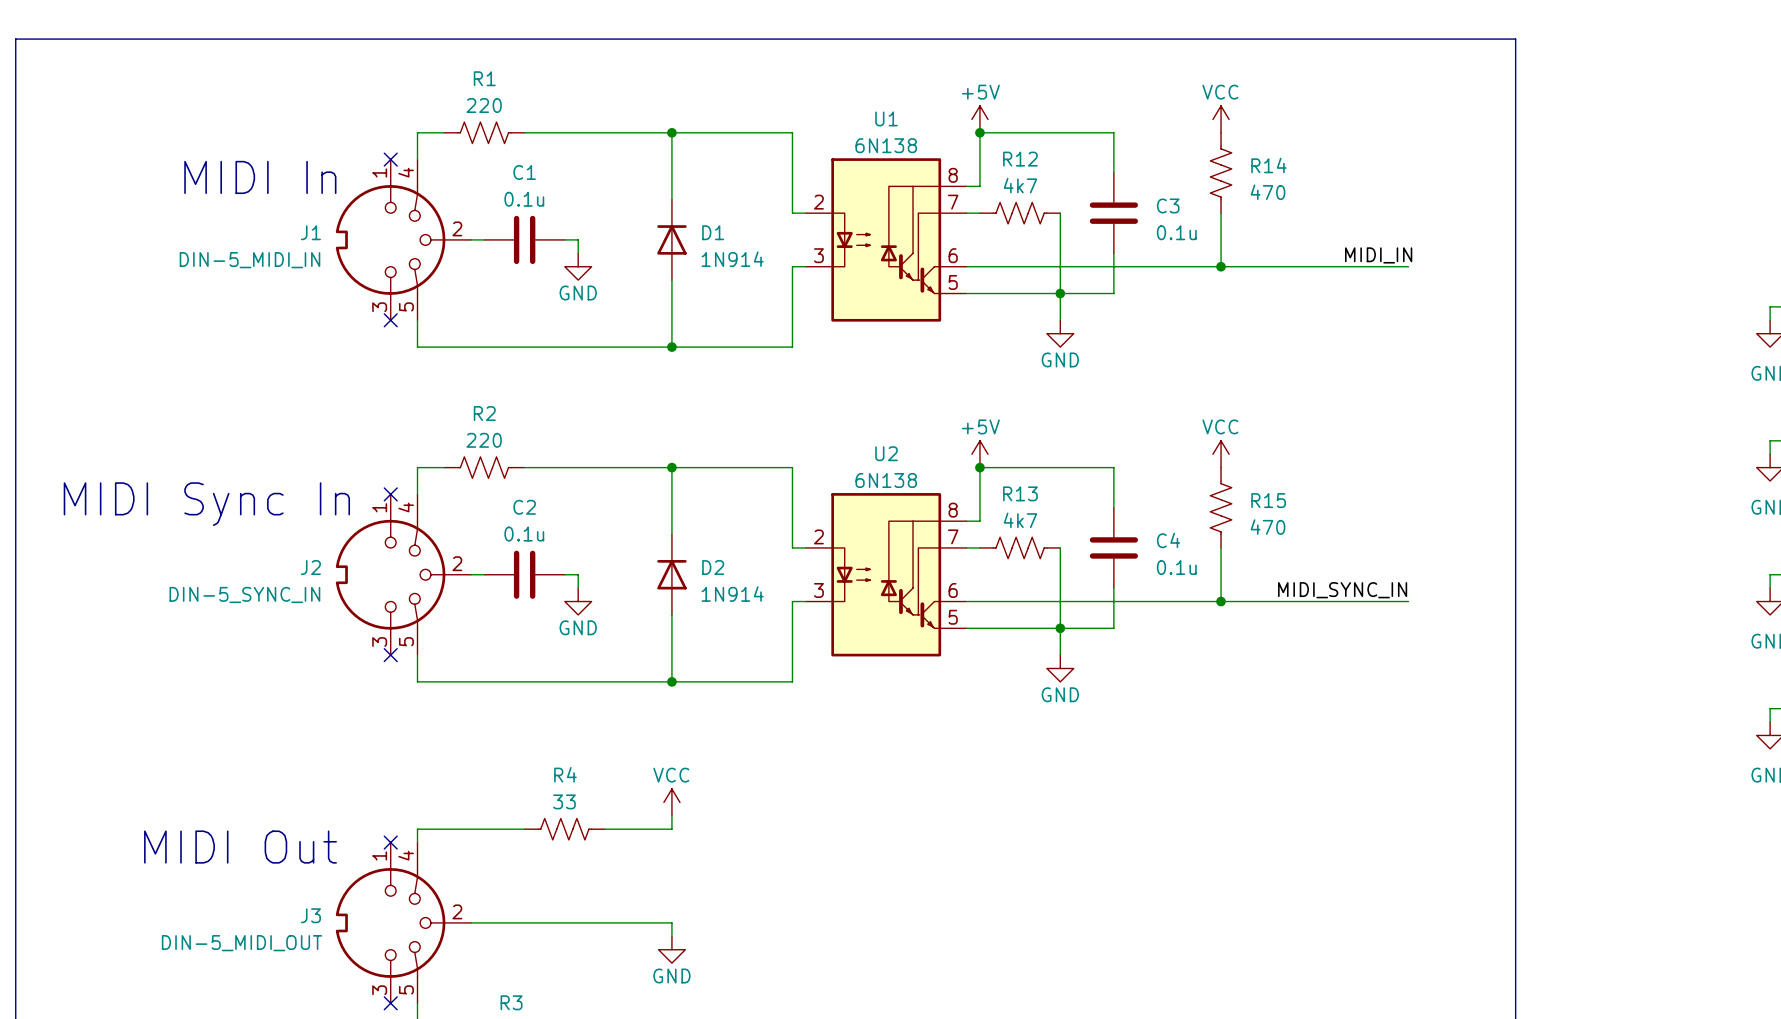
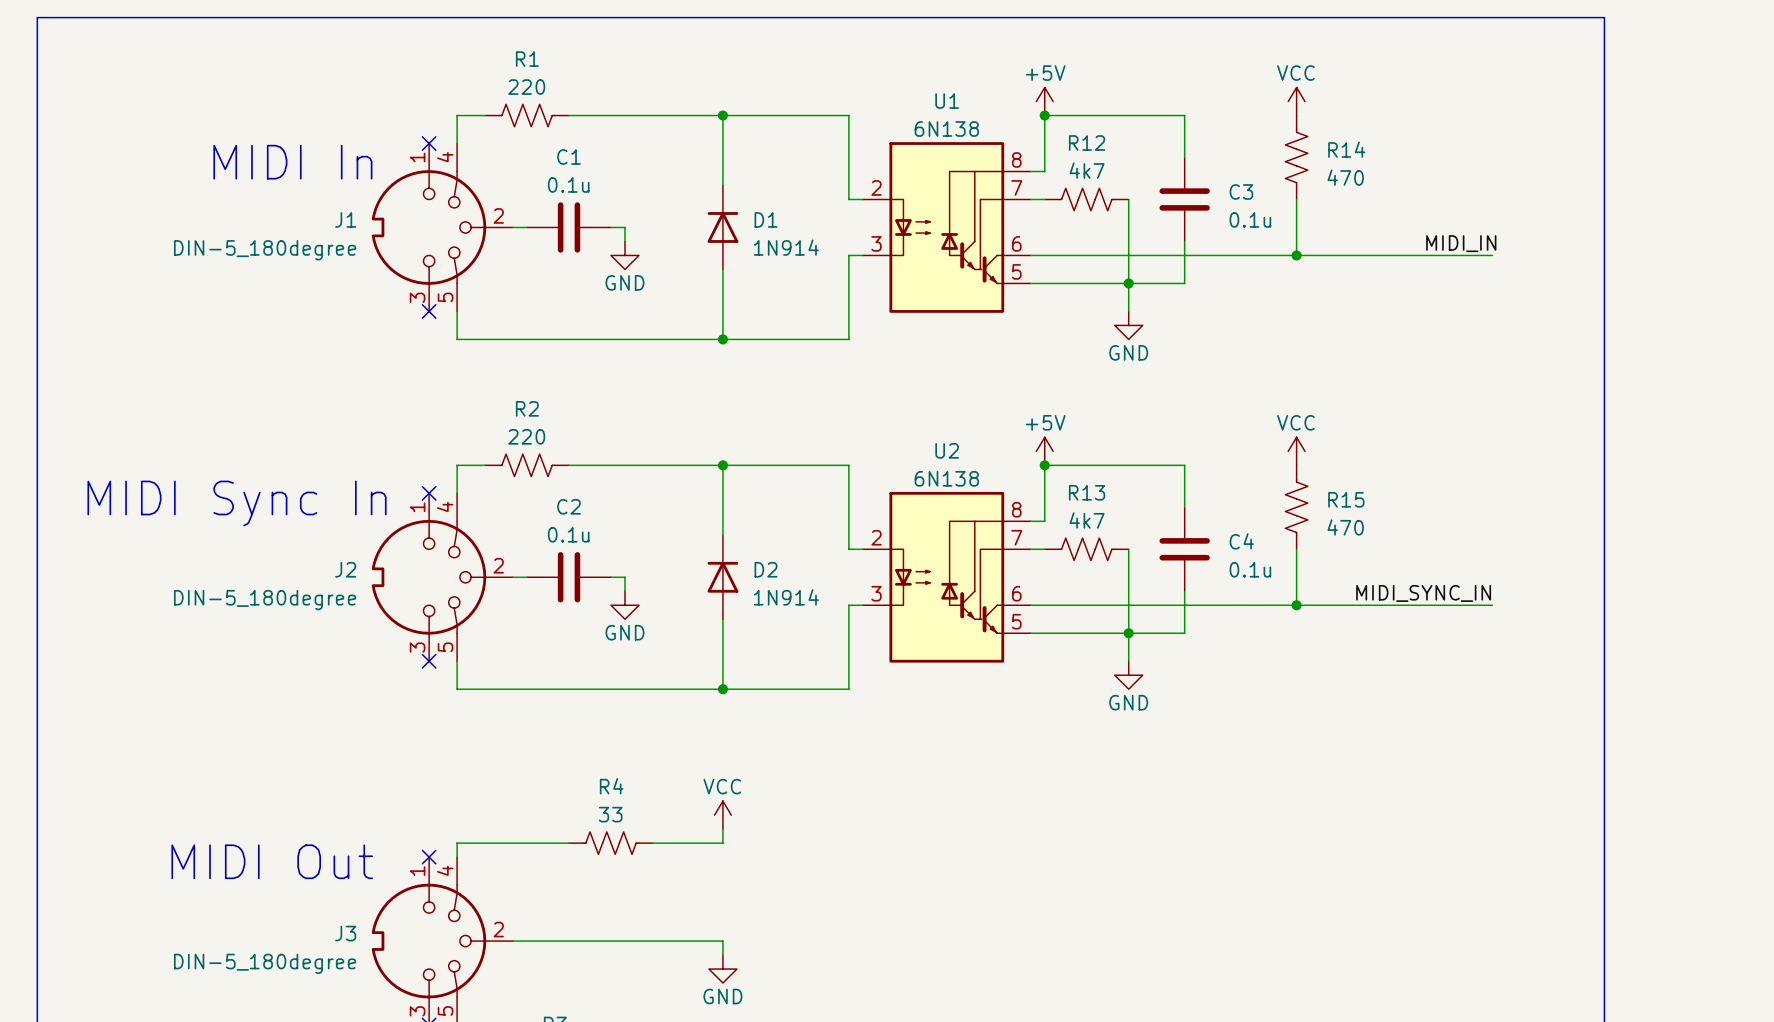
J1 value: DIN-5_MIDI_IN (249, 260) -> DIN-5_180degree (265, 250)
J2 value: DIN-5_SYNC_IN (244, 594) -> DIN-5_180degree (265, 600)
J3 value: DIN-5_MIDI_OUT (242, 943) -> DIN-5_180degree (265, 963)

